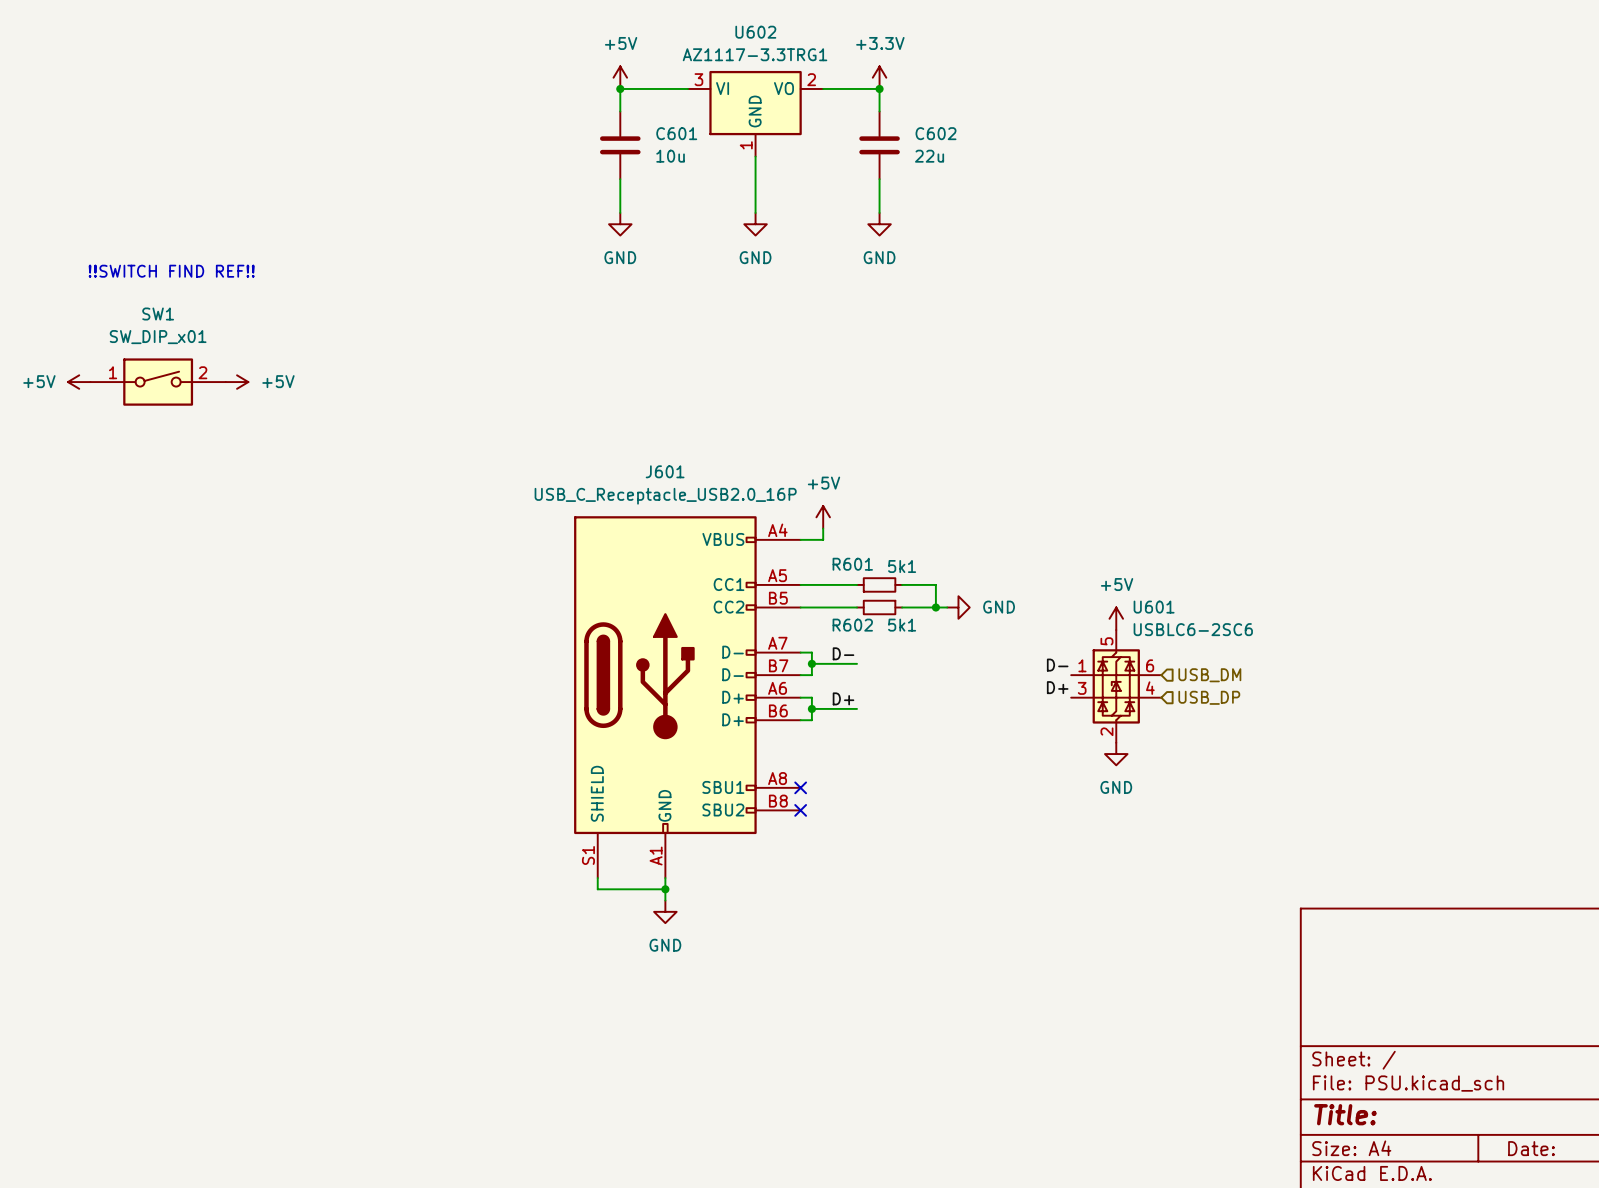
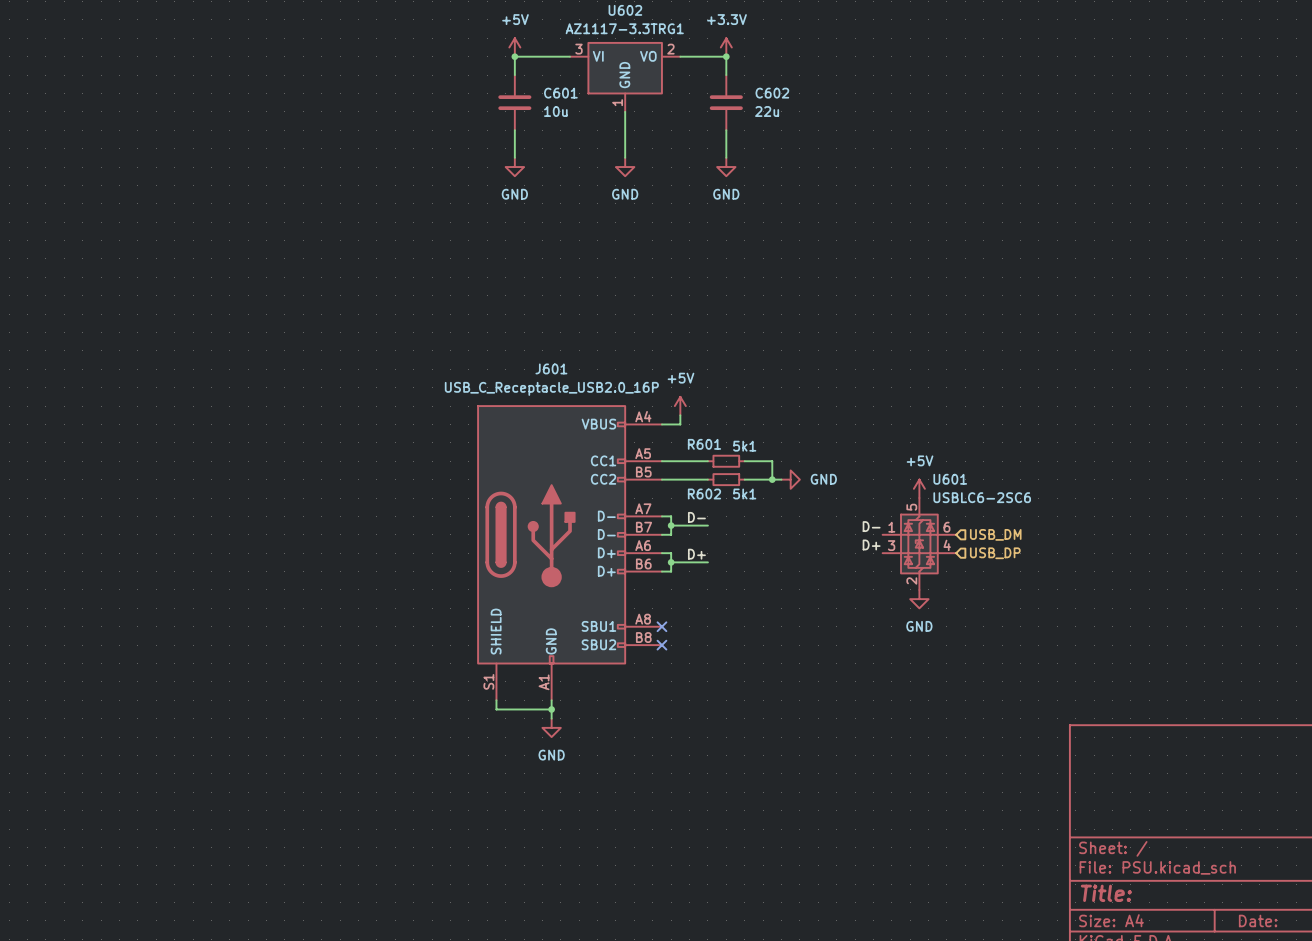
text: !!SWITCH FIND REF!! (171, 271) -> none
power symbol: +5V (79, 382) -> none
SW1: SW_DIP_x01 (158, 382) -> none
power symbol: +5V (237, 382) -> none

